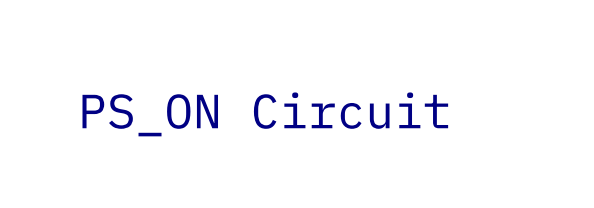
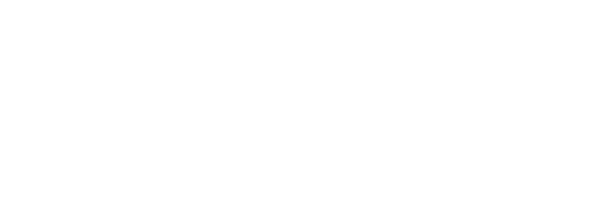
text: PS_ON Circuit (265, 114) -> none

